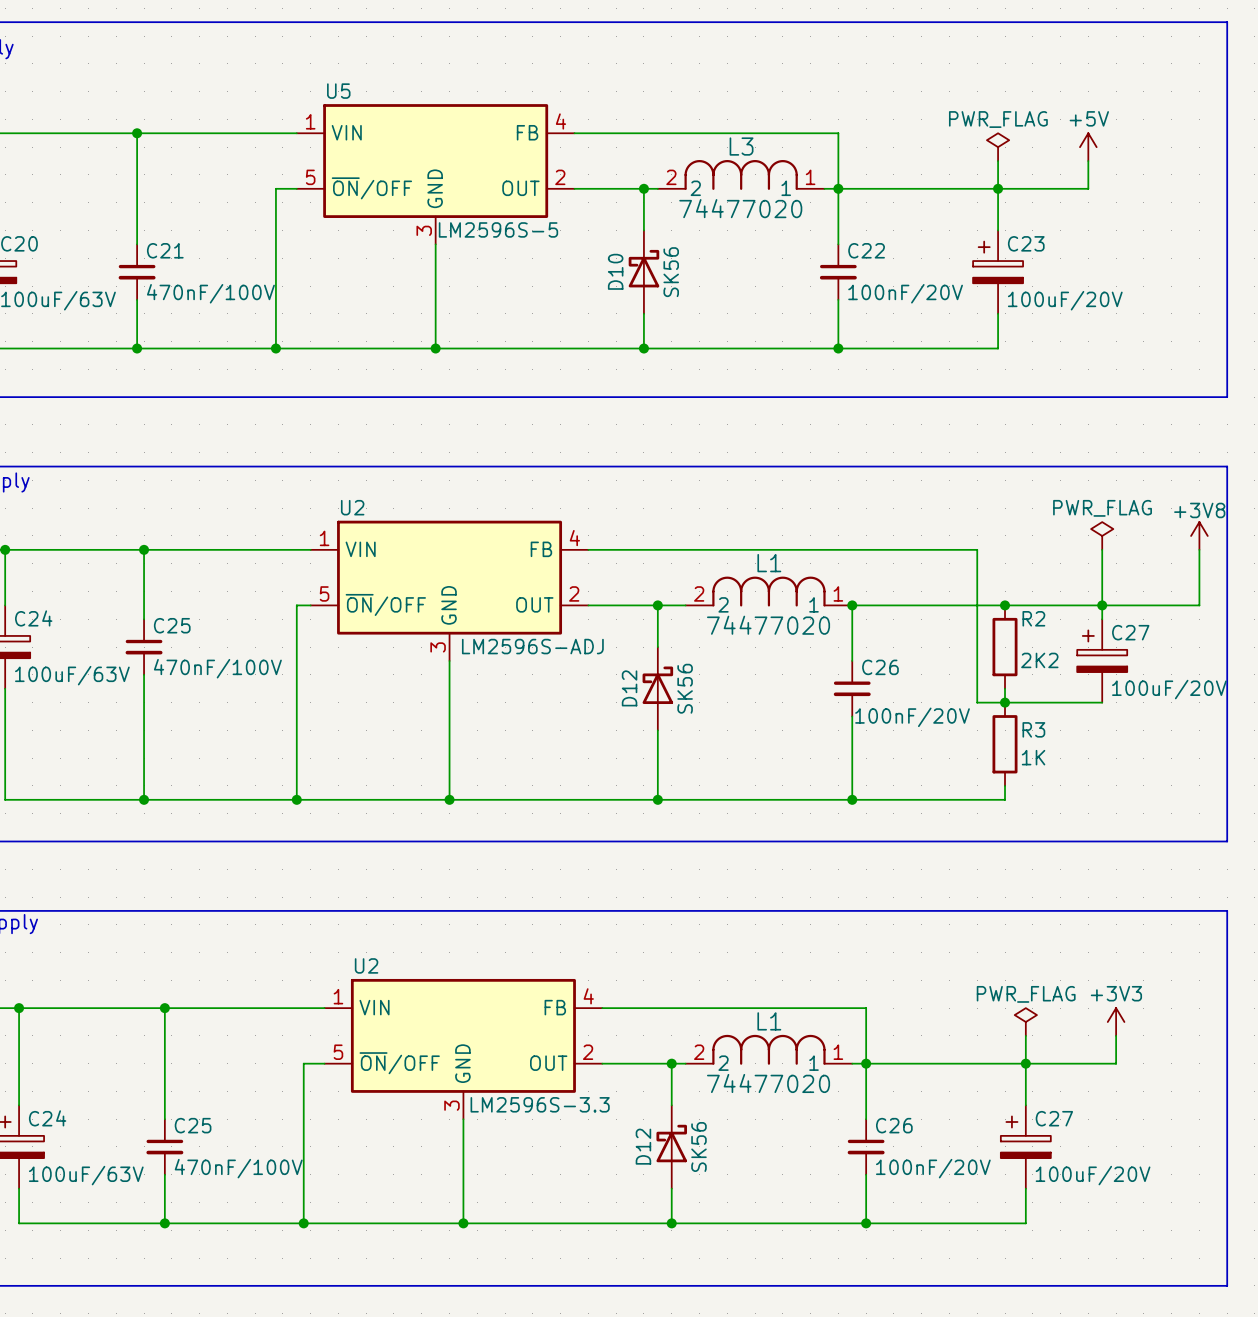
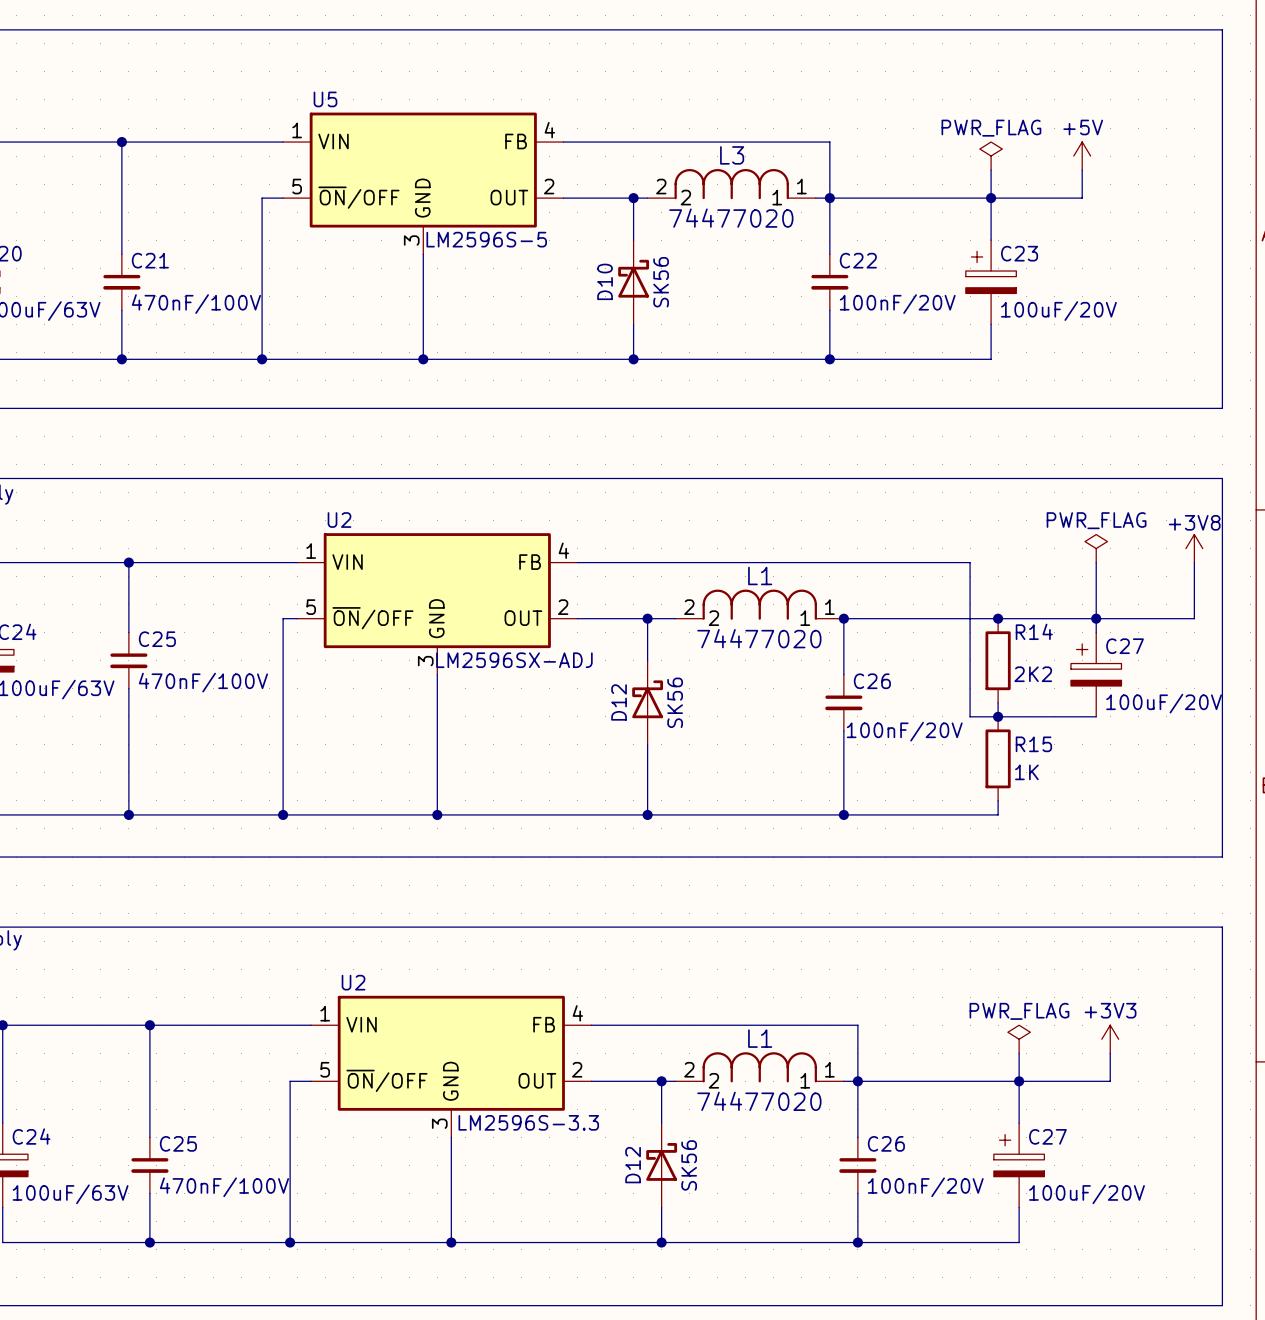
R2 name: R2 (1033, 618) -> R14 (1034, 631)
U2 value: LM2596S-ADJ (532, 646) -> LM2596SX-ADJ (514, 660)
R3 name: R3 (1033, 729) -> R15 (1033, 744)

